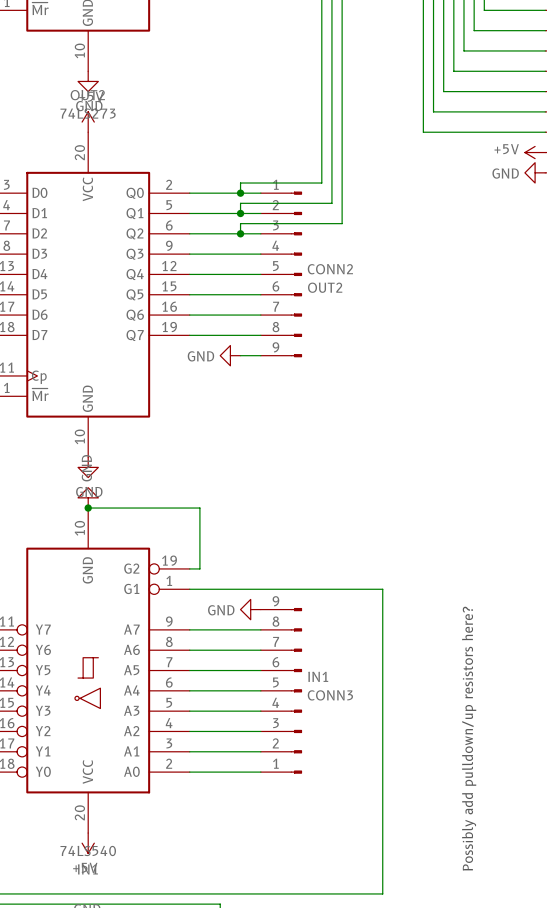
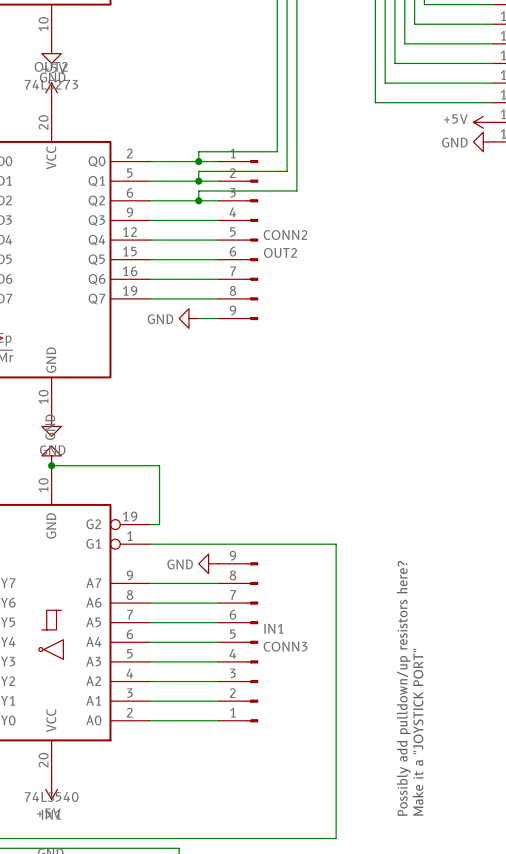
text: none -> Possibly add pulldown/up resistors here? (403, 688)
text: Possibly add pulldown/up resistors here? (469, 738) -> Make it a "JOYSTICK PORT" (418, 732)

